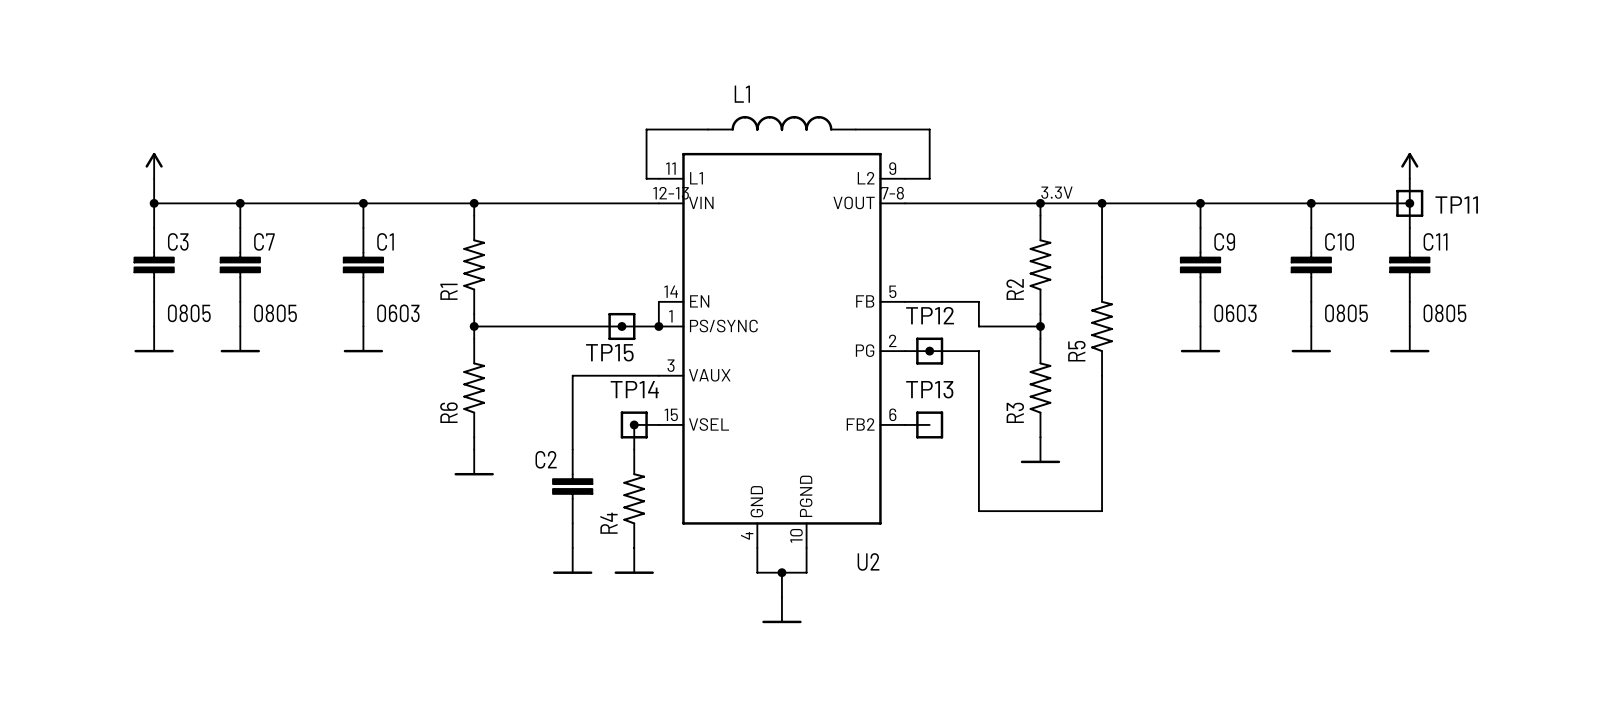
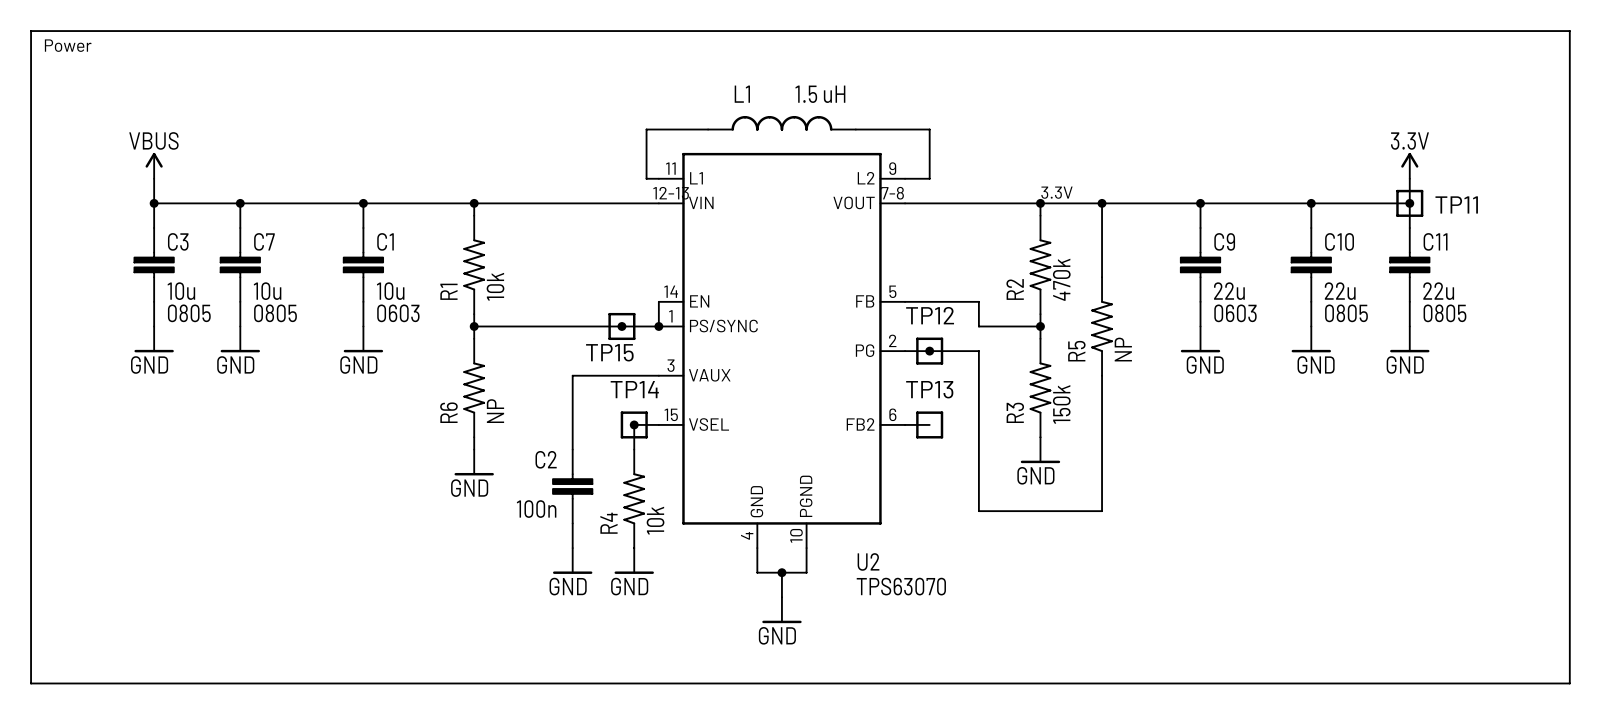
line: none -> (31, 31) (31, 683) (1569, 683) (1569, 31) (31, 31)
text: none -> Power (68, 45)
L1 value: none -> 1.5 uH (820, 94)
power symbol text: none -> VBUS (153, 140)
power symbol text: none -> 3.3V (1409, 141)
R2 value: none -> 470k (1061, 279)
R1 value: none -> 10k (495, 286)
C3 value: none -> 10u (181, 291)
C7 value: none -> 10u (267, 291)
C1 value: none -> 10u (390, 291)
C9 value: none -> 22u (1229, 291)
C10 value: none -> 22u (1340, 291)
C11 value: none -> 22u (1438, 291)
R5 value: none -> NP (1123, 349)
power symbol text: none -> GND (149, 365)
power symbol text: none -> GND (235, 365)
power symbol text: none -> GND (358, 365)
power symbol text: none -> GND (1205, 365)
power symbol text: none -> GND (1316, 365)
power symbol text: none -> GND (1405, 365)
R3 value: none -> 150k (1061, 404)
R6 value: none -> NP (495, 411)
power symbol text: none -> GND (1035, 475)
power symbol text: none -> GND (469, 488)
C2 value: none -> 100n (536, 509)
R4 value: none -> 10k (655, 520)
power symbol text: none -> GND (568, 586)
power symbol text: none -> GND (629, 586)
U2 value: none -> TPS63070 (901, 586)
power symbol text: none -> GND (777, 635)

